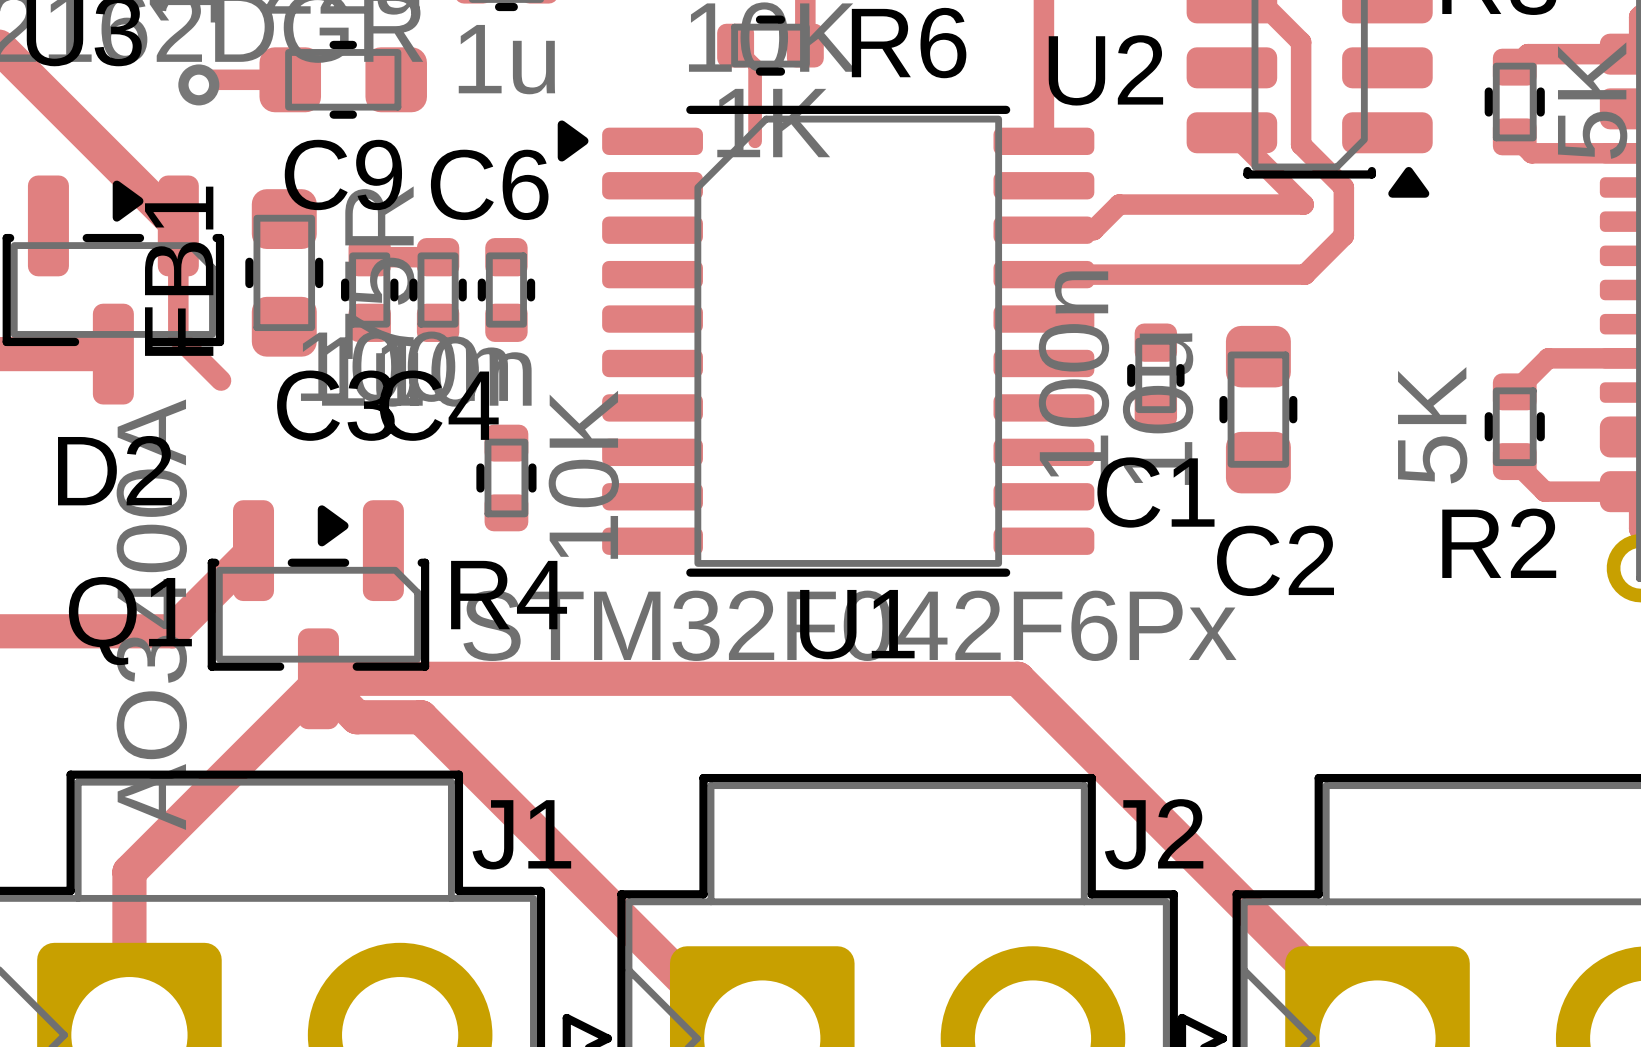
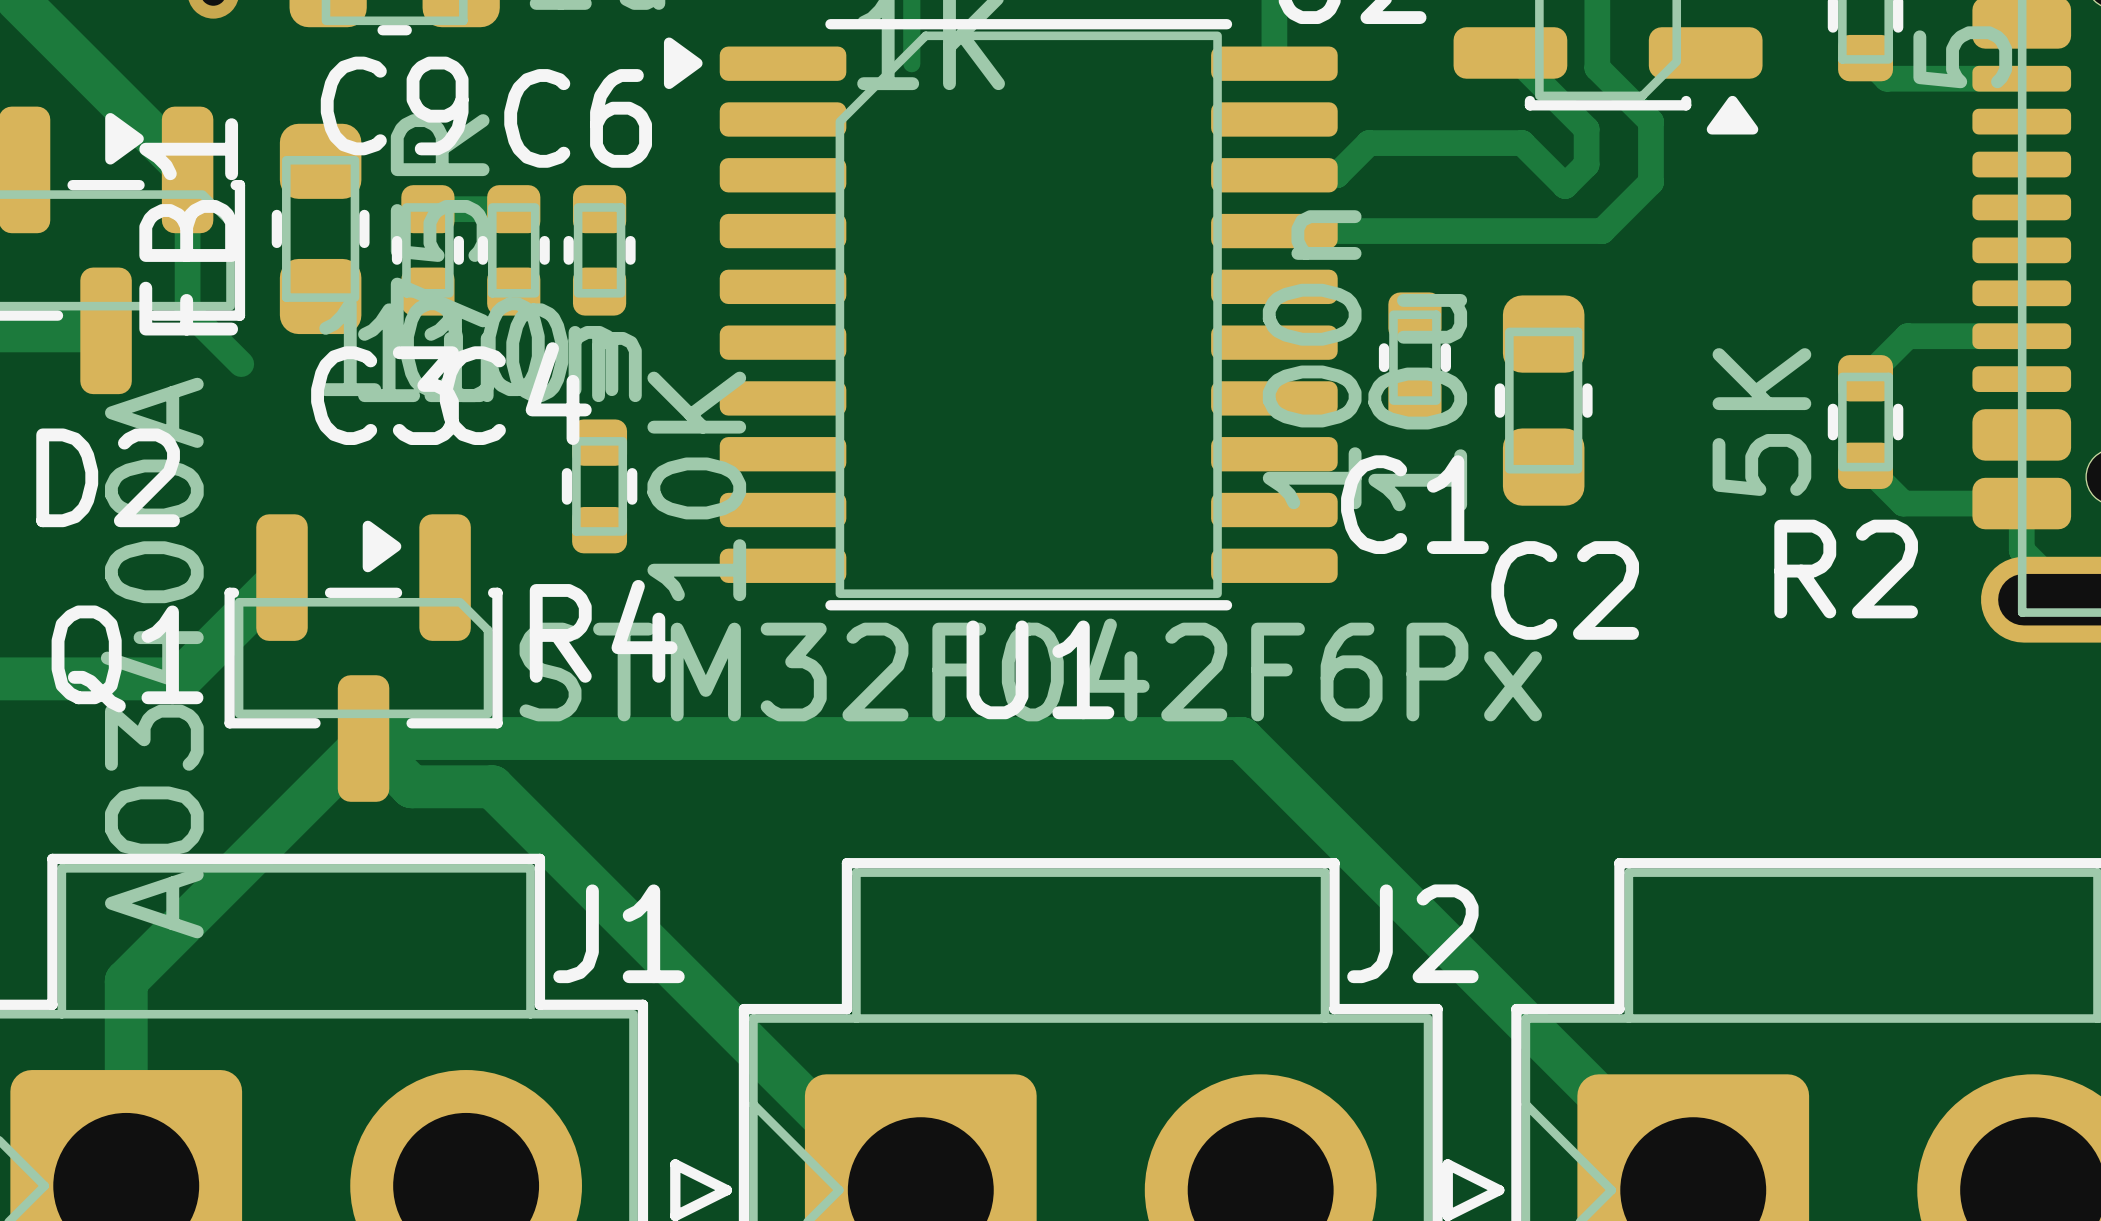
track: (1292, 193) (1303, 204) (1241, 204) -> (1586, 129) (1586, 164) (1565, 186) (1522, 143)

